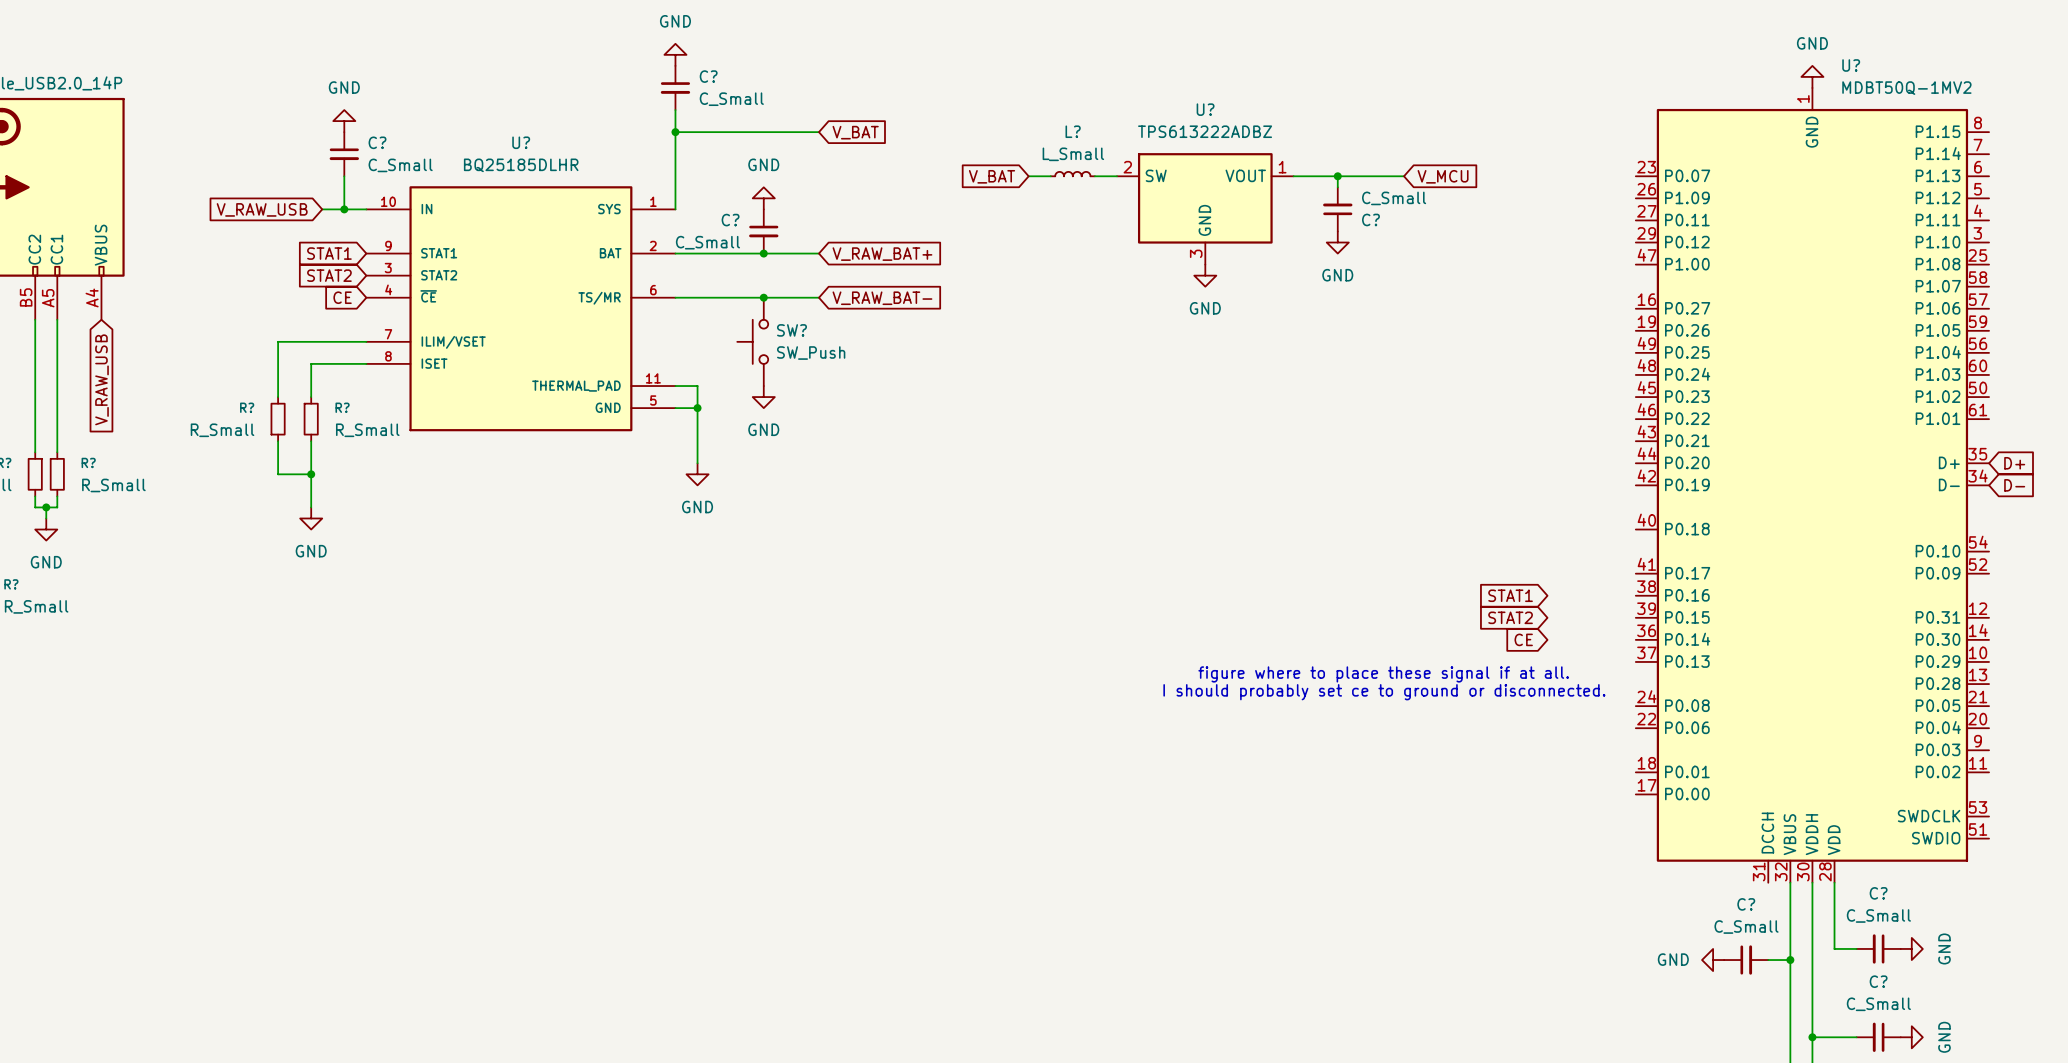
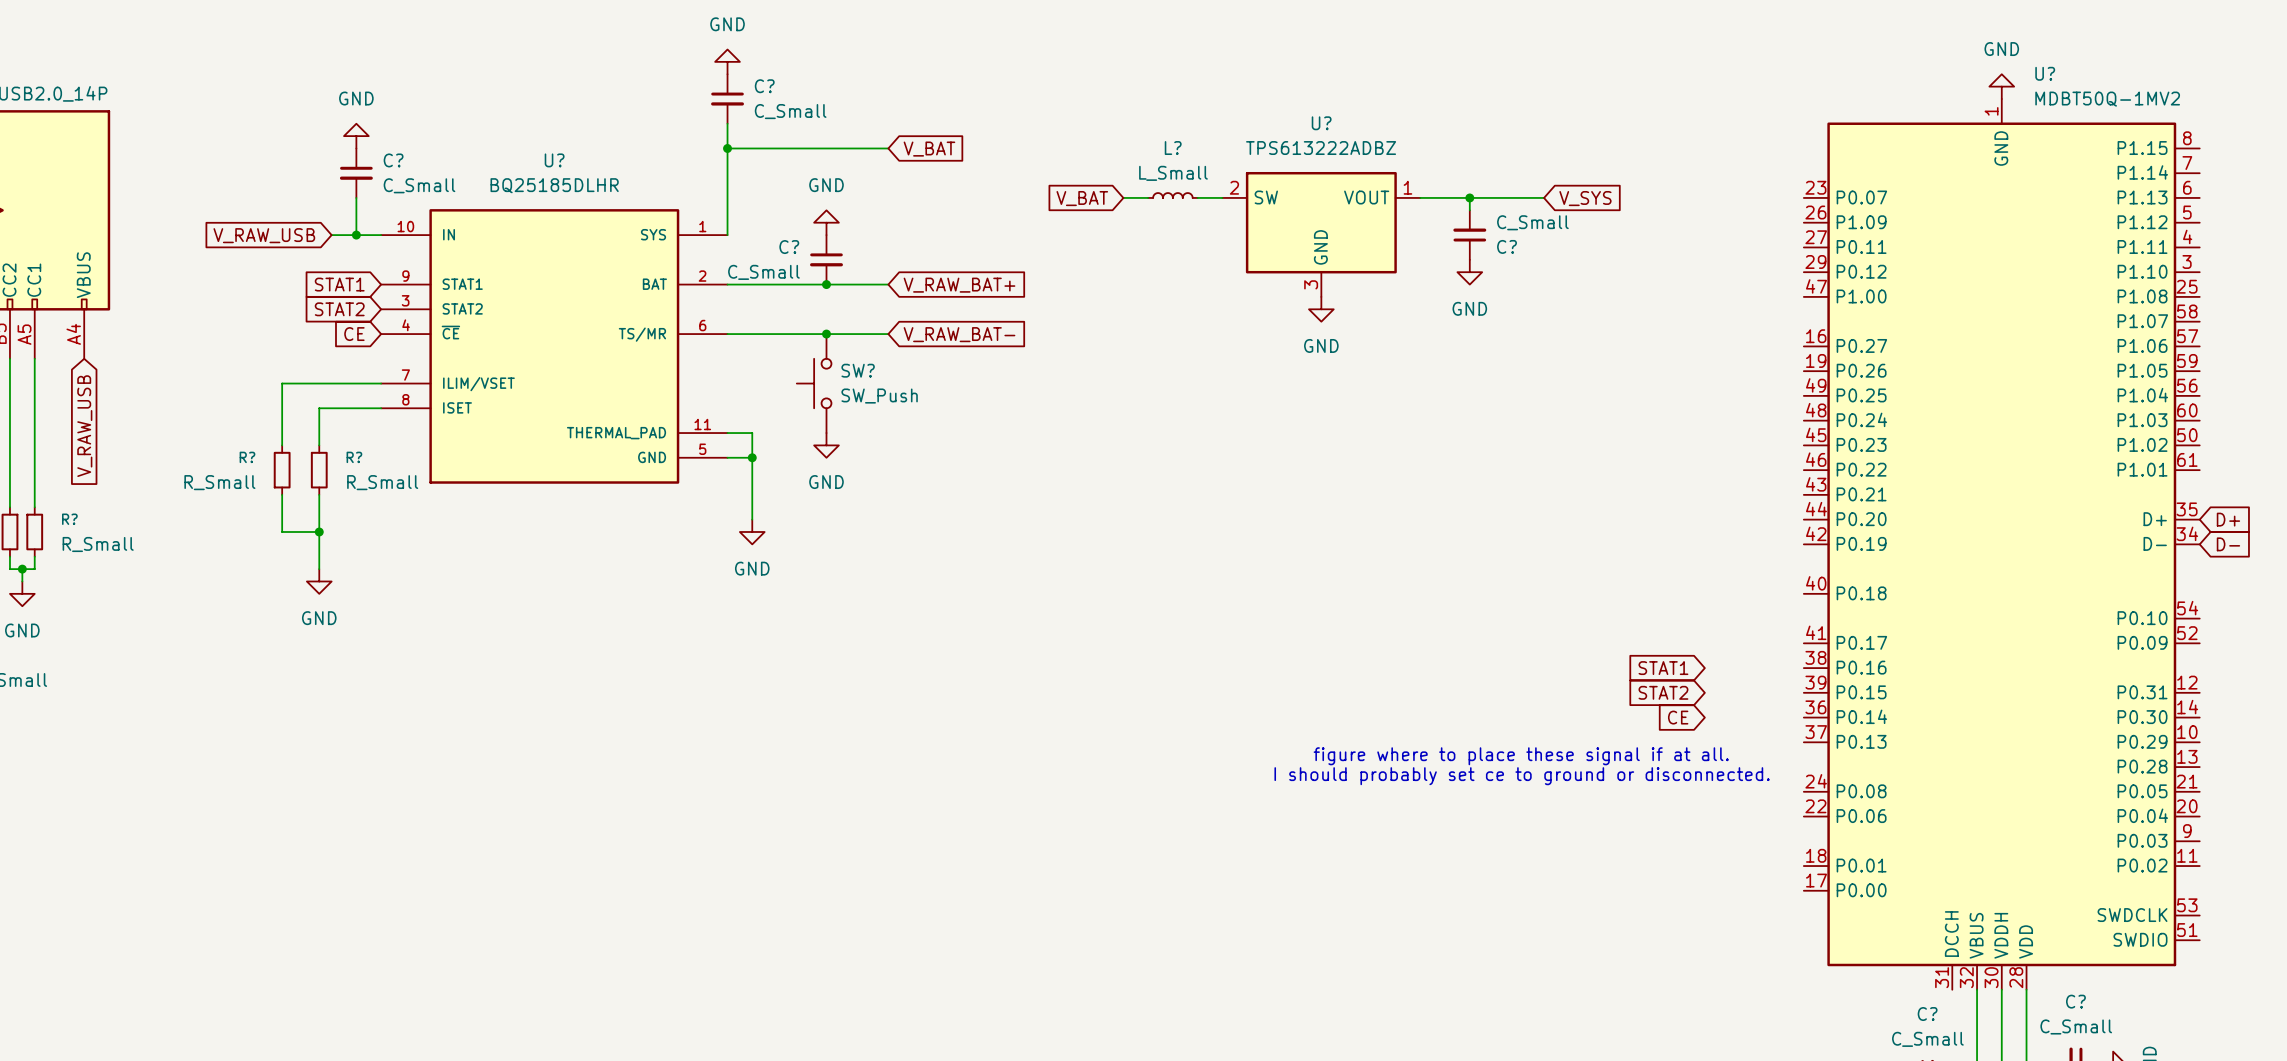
global label: V_MCU (1443, 176) -> V_SYS (1585, 198)

